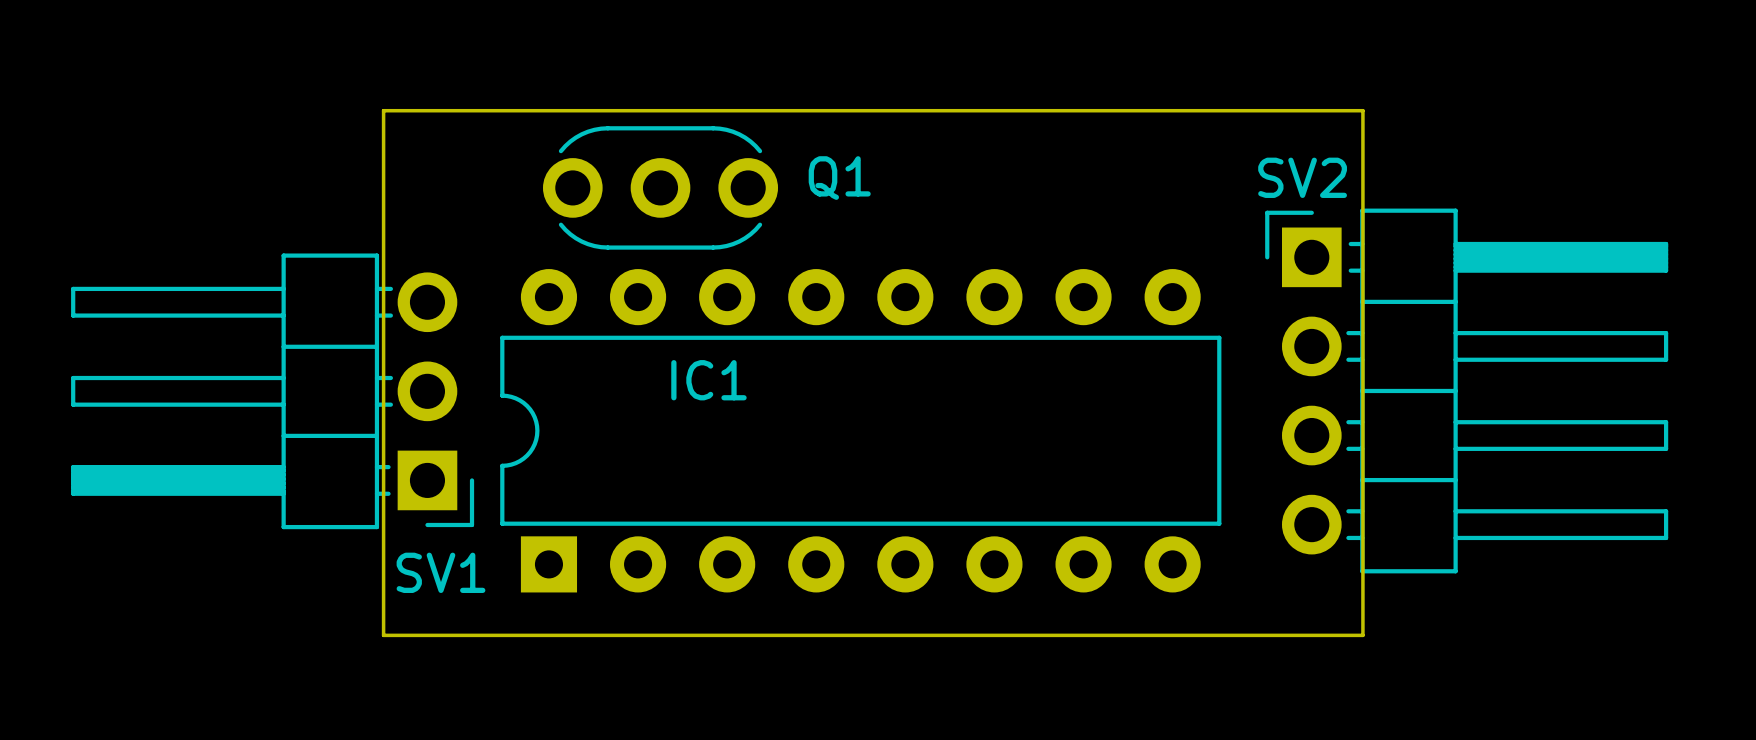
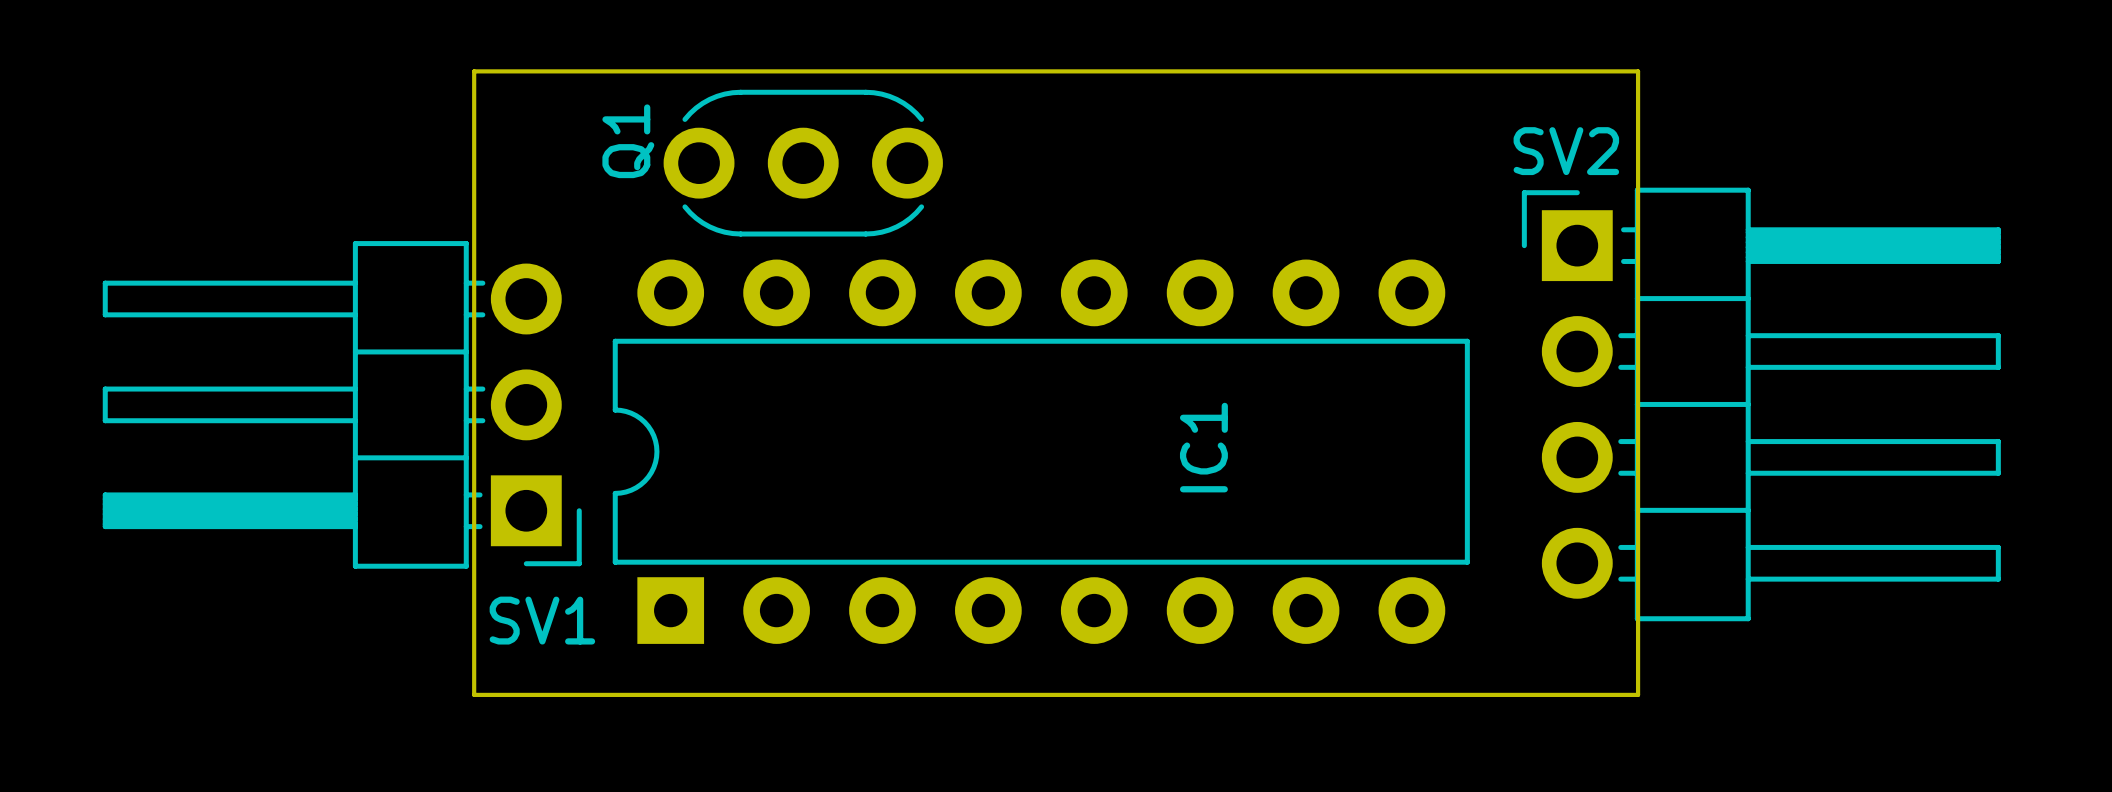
Q1 name rotation: 0° (839, 178) -> 90° counterclockwise (628, 141)
Q1 name position: Q1 (839, 178) -> Q1 (628, 141)
IC1 name rotation: 0° (708, 380) -> 90° counterclockwise (1203, 447)
IC1 name position: IC1 (708, 380) -> IC1 (1203, 447)

